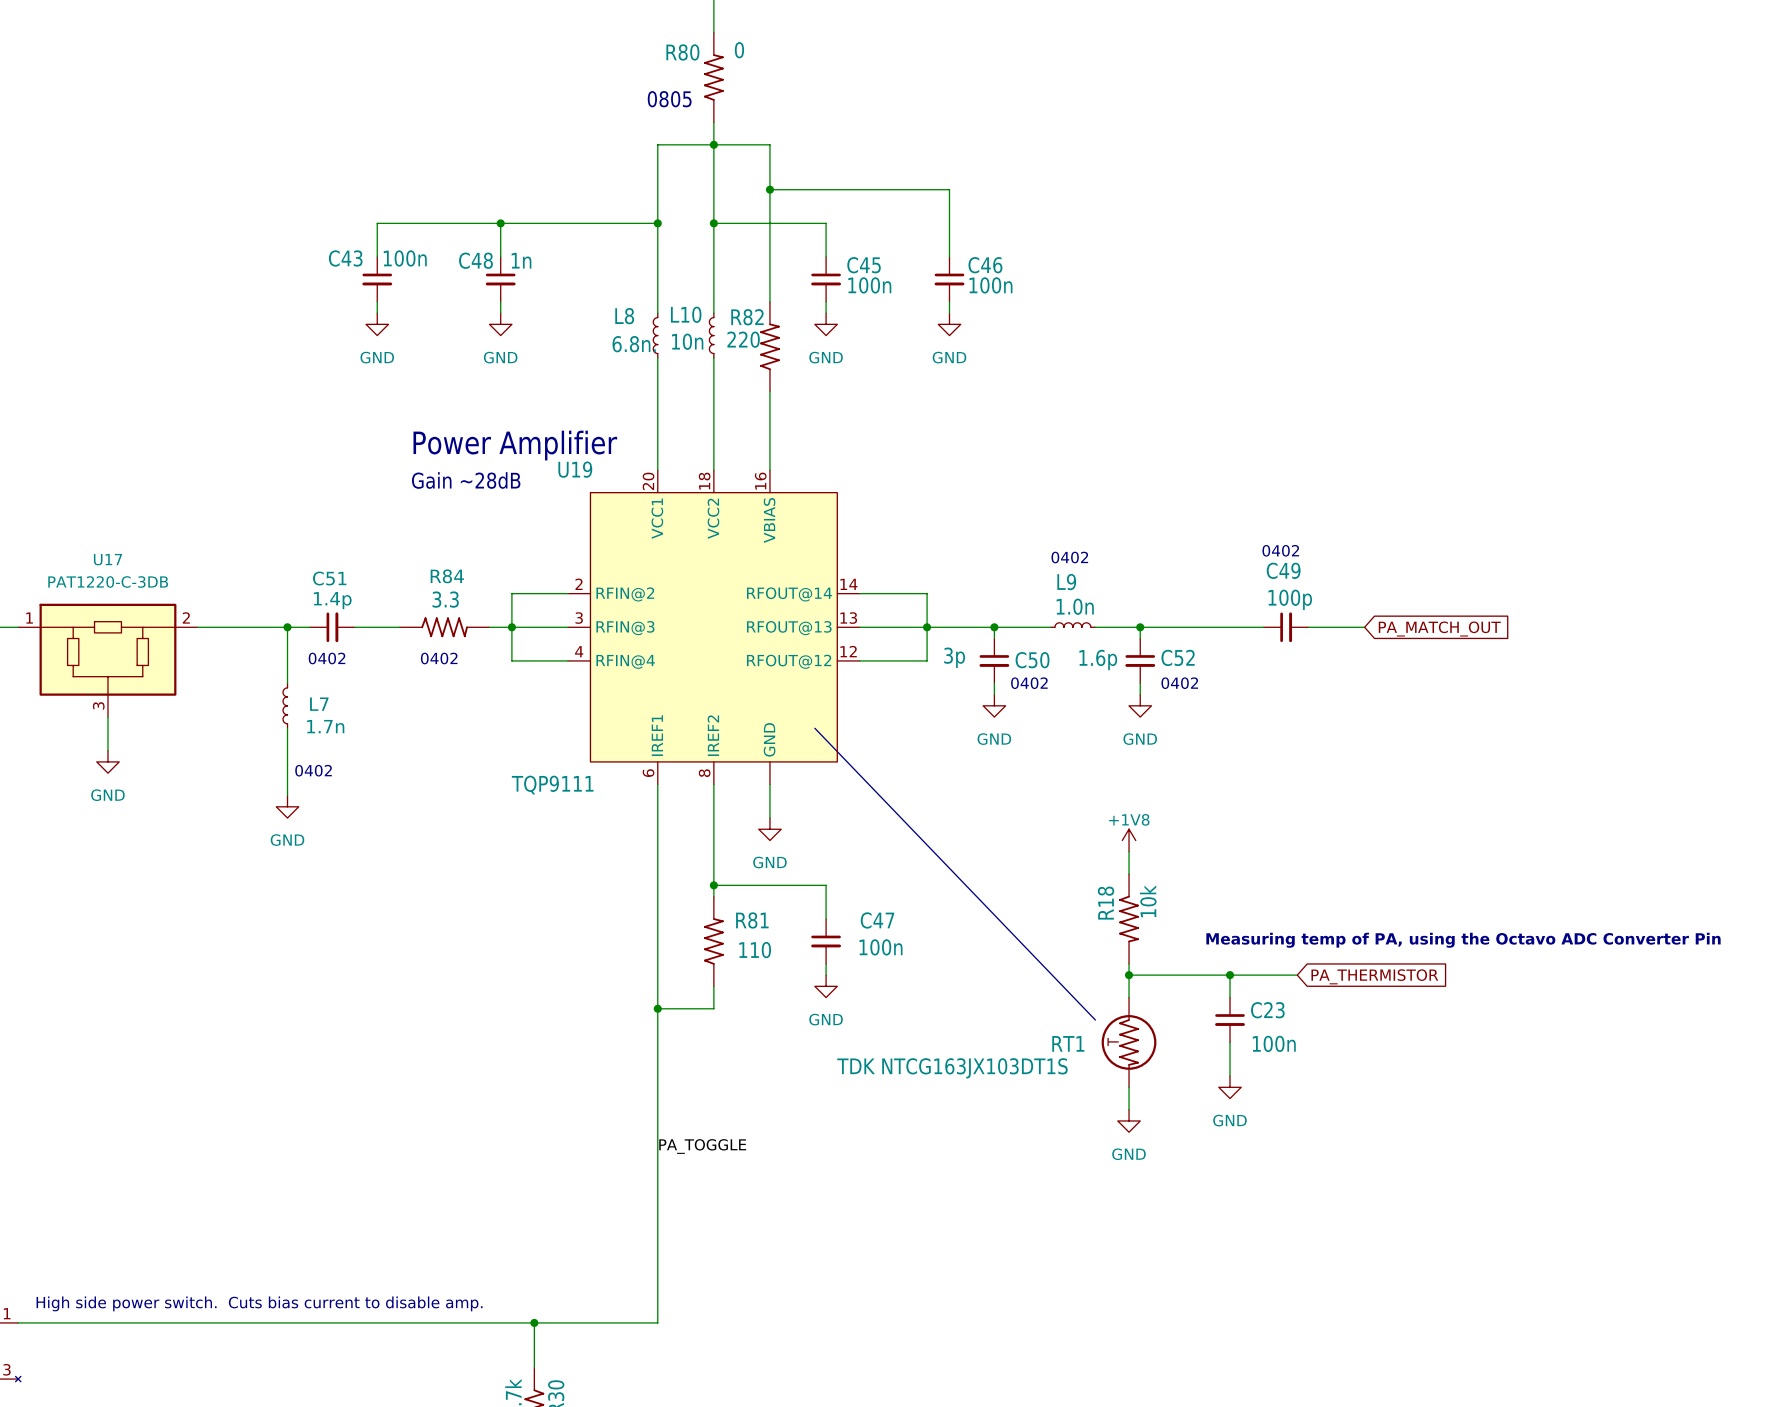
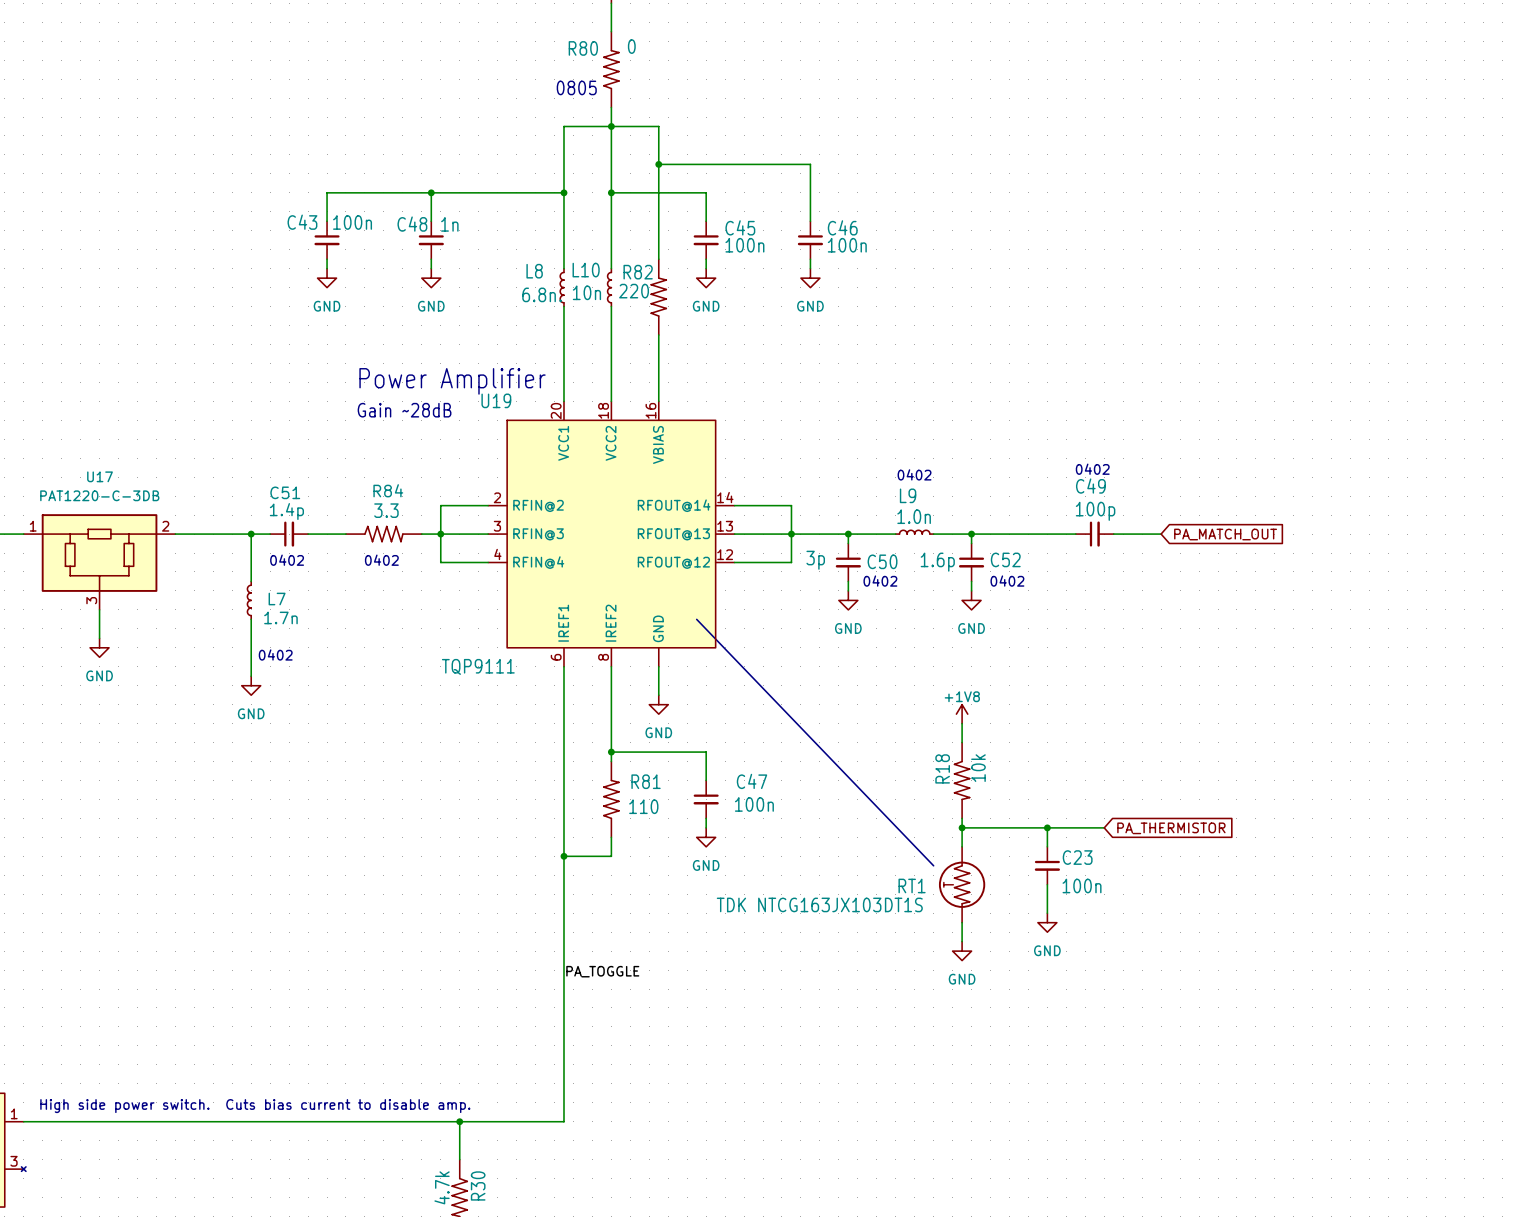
text: Measuring temp of PA, using the Octavo ADC Converter Pin (1463, 940) -> none

